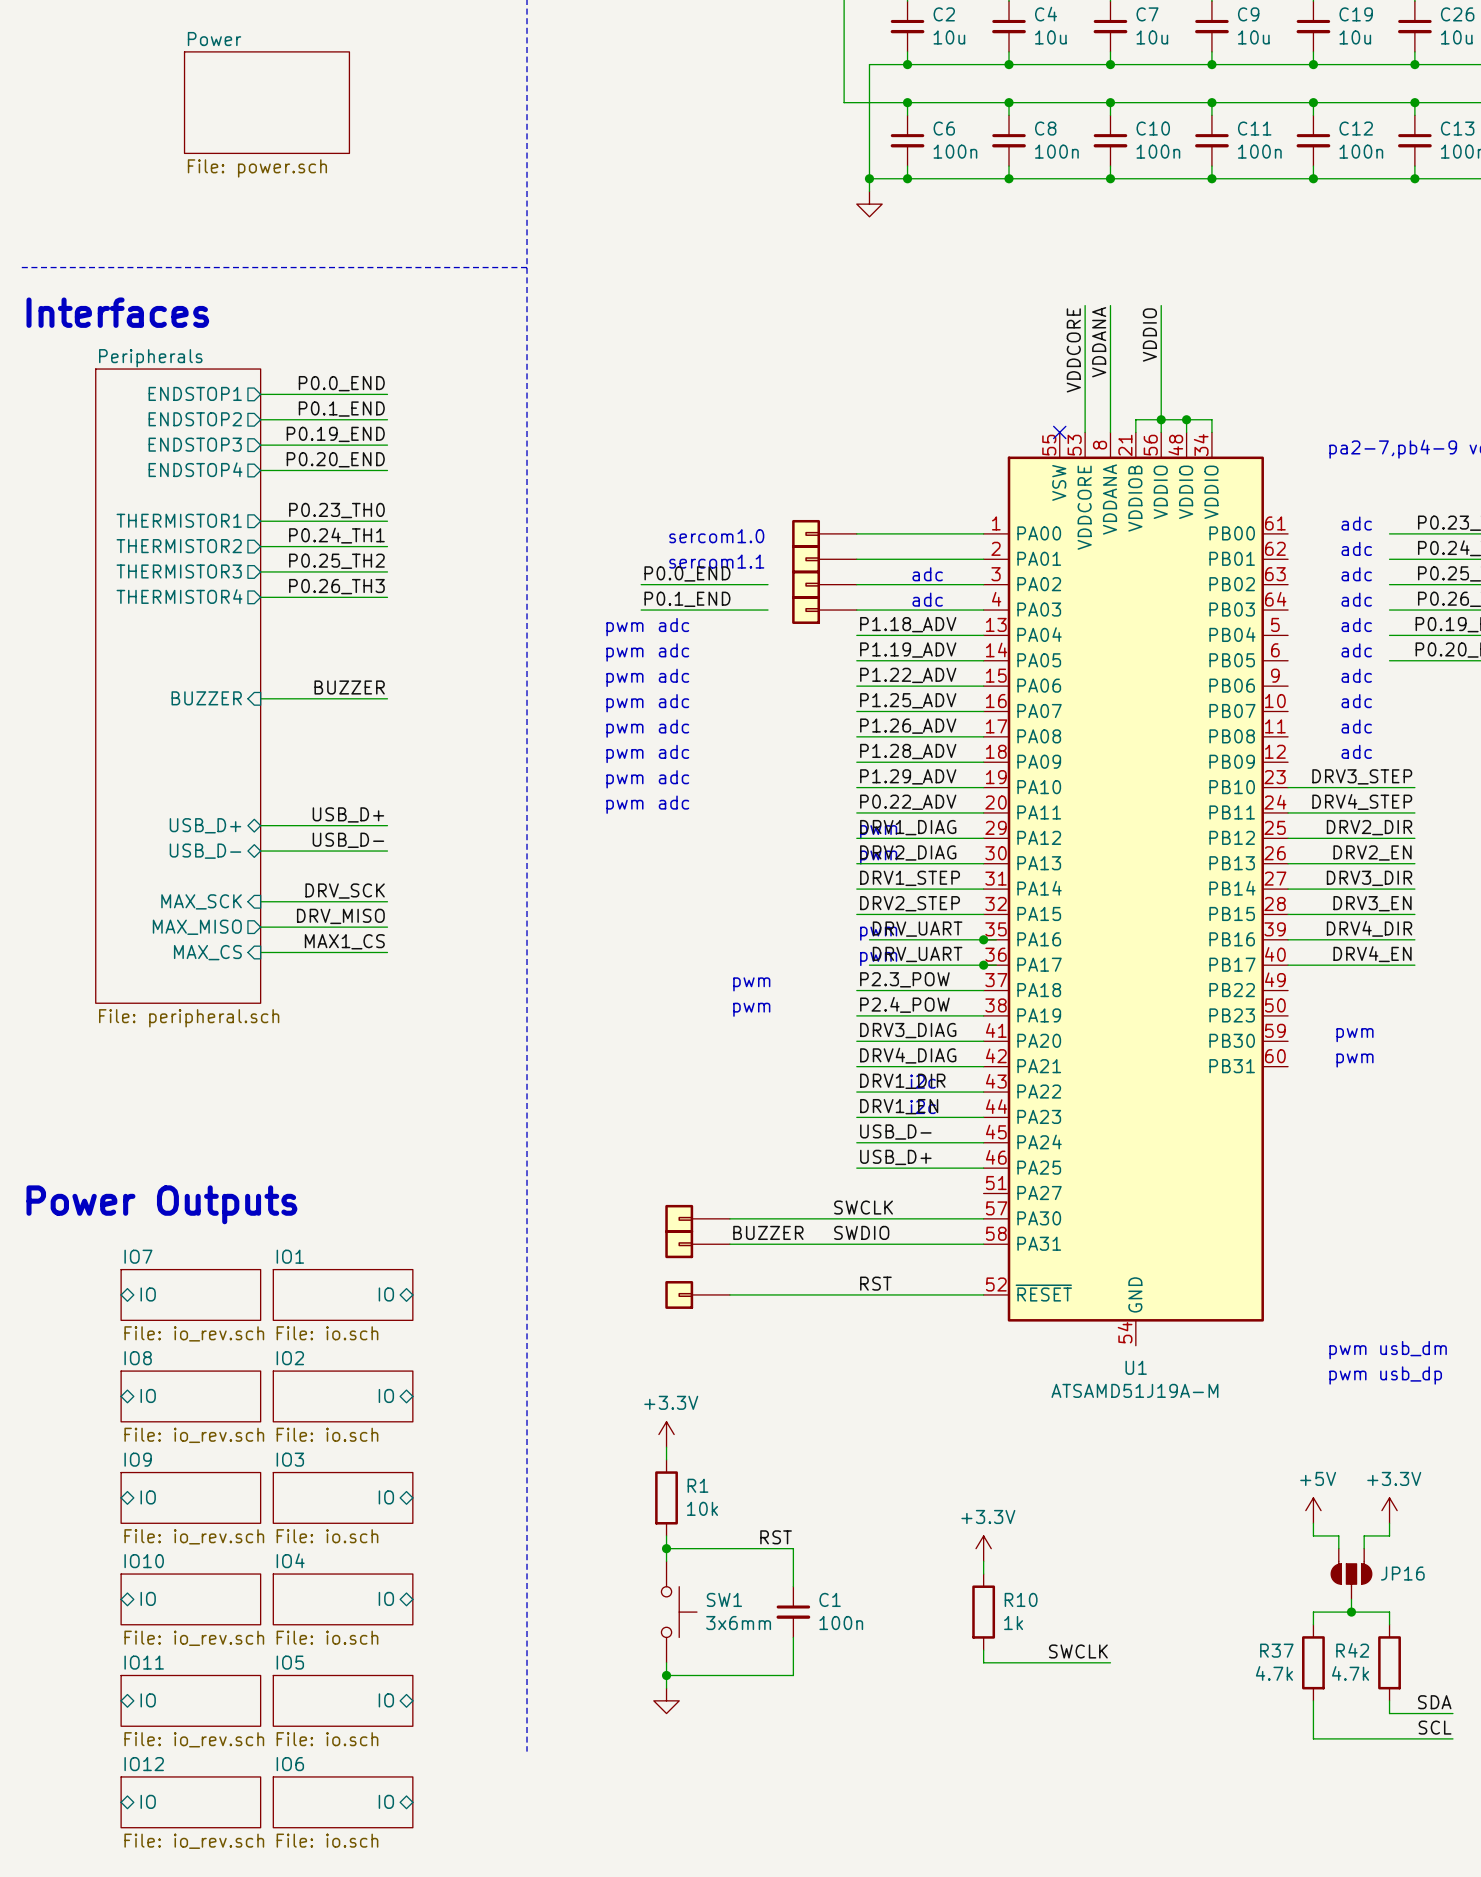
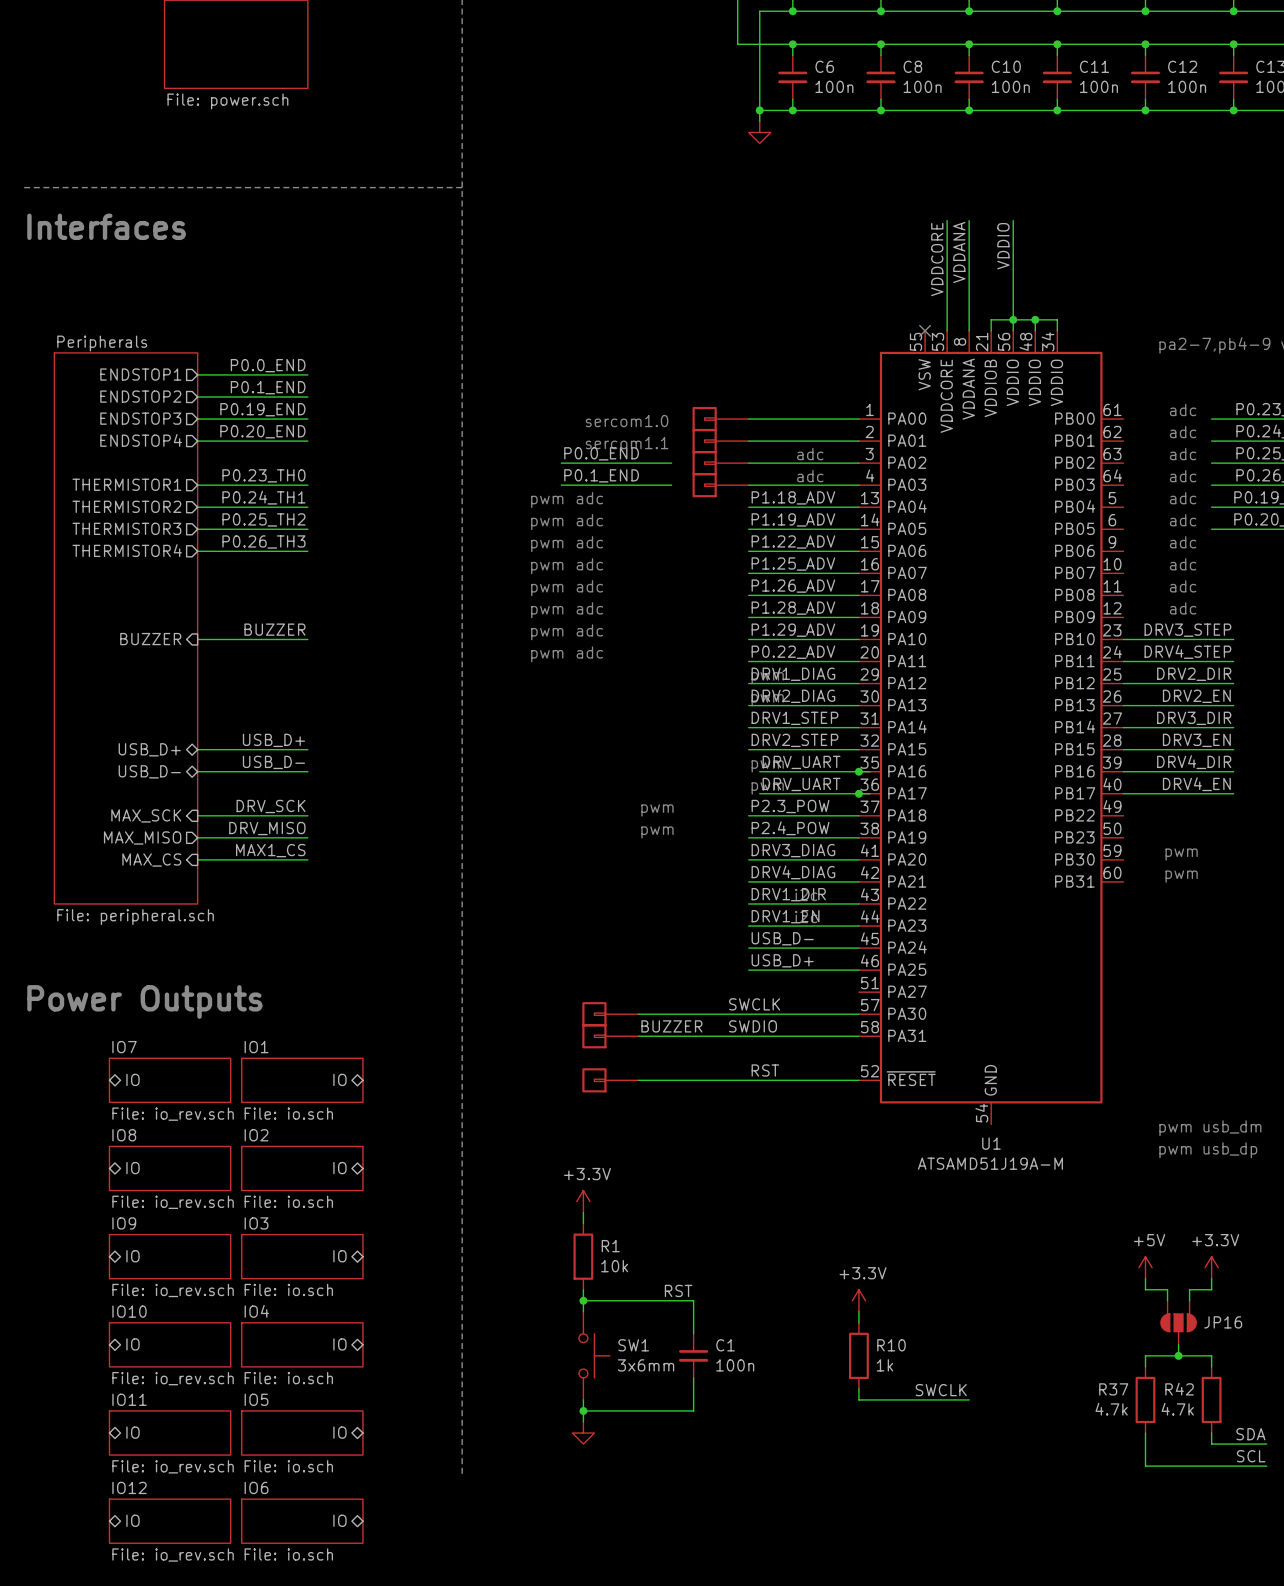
label position: P0.0_END (341, 383) -> P0.0_END (268, 365)
sheet pin position: ENDSTOP1 (195, 393) -> ENDSTOP1 (140, 374)
wire: (260, 394) (387, 394) -> (197, 374) (307, 374)
label position: P0.1_END (341, 409) -> P0.1_END (268, 387)
sheet pin position: ENDSTOP2 (195, 419) -> ENDSTOP2 (140, 396)
wire: (260, 419) (387, 419) -> (197, 396) (307, 396)
label position: P0.19_END (335, 434) -> P0.19_END (262, 409)
sheet pin position: ENDSTOP3 (195, 444) -> ENDSTOP3 (140, 418)
wire: (260, 445) (387, 445) -> (197, 419) (307, 419)
label position: P0.20_END (335, 459) -> P0.20_END (262, 431)
sheet pin position: ENDSTOP4 (195, 469) -> ENDSTOP4 (141, 440)
wire: (260, 470) (387, 470) -> (197, 441) (307, 441)
label position: P0.23_TH0 (336, 510) -> P0.23_TH0 (263, 475)
sheet pin position: THERMISTOR1 (179, 520) -> THERMISTOR1 (126, 484)
wire: (260, 521) (387, 521) -> (197, 485) (307, 485)
label position: P0.24_TH1 (336, 535) -> P0.24_TH1 (263, 497)
sheet pin position: THERMISTOR2 (179, 546) -> THERMISTOR2 (126, 506)
wire: (260, 546) (387, 546) -> (197, 507) (307, 507)
label position: P0.25_TH2 (336, 561) -> P0.25_TH2 (263, 519)
sheet pin position: THERMISTOR3 (179, 571) -> THERMISTOR3 (126, 528)
wire: (260, 571) (387, 571) -> (197, 529) (307, 529)
label position: P0.26_TH3 (336, 586) -> P0.26_TH3 (263, 541)
sheet pin position: THERMISTOR4 (179, 596) -> THERMISTOR4 (127, 550)
wire: (260, 597) (387, 597) -> (197, 551) (307, 551)
sheet Peripherals position: (178, 686) -> (126, 628)
label position: BUZZER (349, 687) -> BUZZER (274, 629)
sheet pin position: BUZZER (206, 698) -> BUZZER (150, 639)
wire: (260, 698) (387, 698) -> (197, 639) (307, 639)
label position: USB_D+ (348, 814) -> USB_D+ (273, 740)
sheet pin position: USB_D+ (205, 825) -> USB_D+ (149, 749)
wire: (260, 825) (387, 825) -> (197, 749) (307, 749)
label position: USB_D- (348, 840) -> USB_D- (273, 762)
sheet pin position: USB_D- (205, 851) -> USB_D- (149, 771)
wire: (260, 851) (387, 851) -> (197, 771) (307, 771)
label position: DRV_SCK (345, 891) -> DRV_SCK (271, 806)
sheet pin position: MAX_SCK (201, 901) -> MAX_SCK (146, 815)
wire: (260, 901) (387, 901) -> (197, 815) (307, 815)
label position: DRV_MISO (340, 916) -> DRV_MISO (267, 828)
sheet pin position: MAX_MISO (197, 927) -> MAX_MISO (142, 837)
wire: (260, 927) (387, 927) -> (197, 837) (307, 837)
label position: MAX1_CS (344, 941) -> MAX1_CS (270, 850)
sheet pin position: MAX_CS (207, 952) -> MAX_CS (151, 860)
wire: (260, 952) (387, 952) -> (197, 859) (307, 859)

